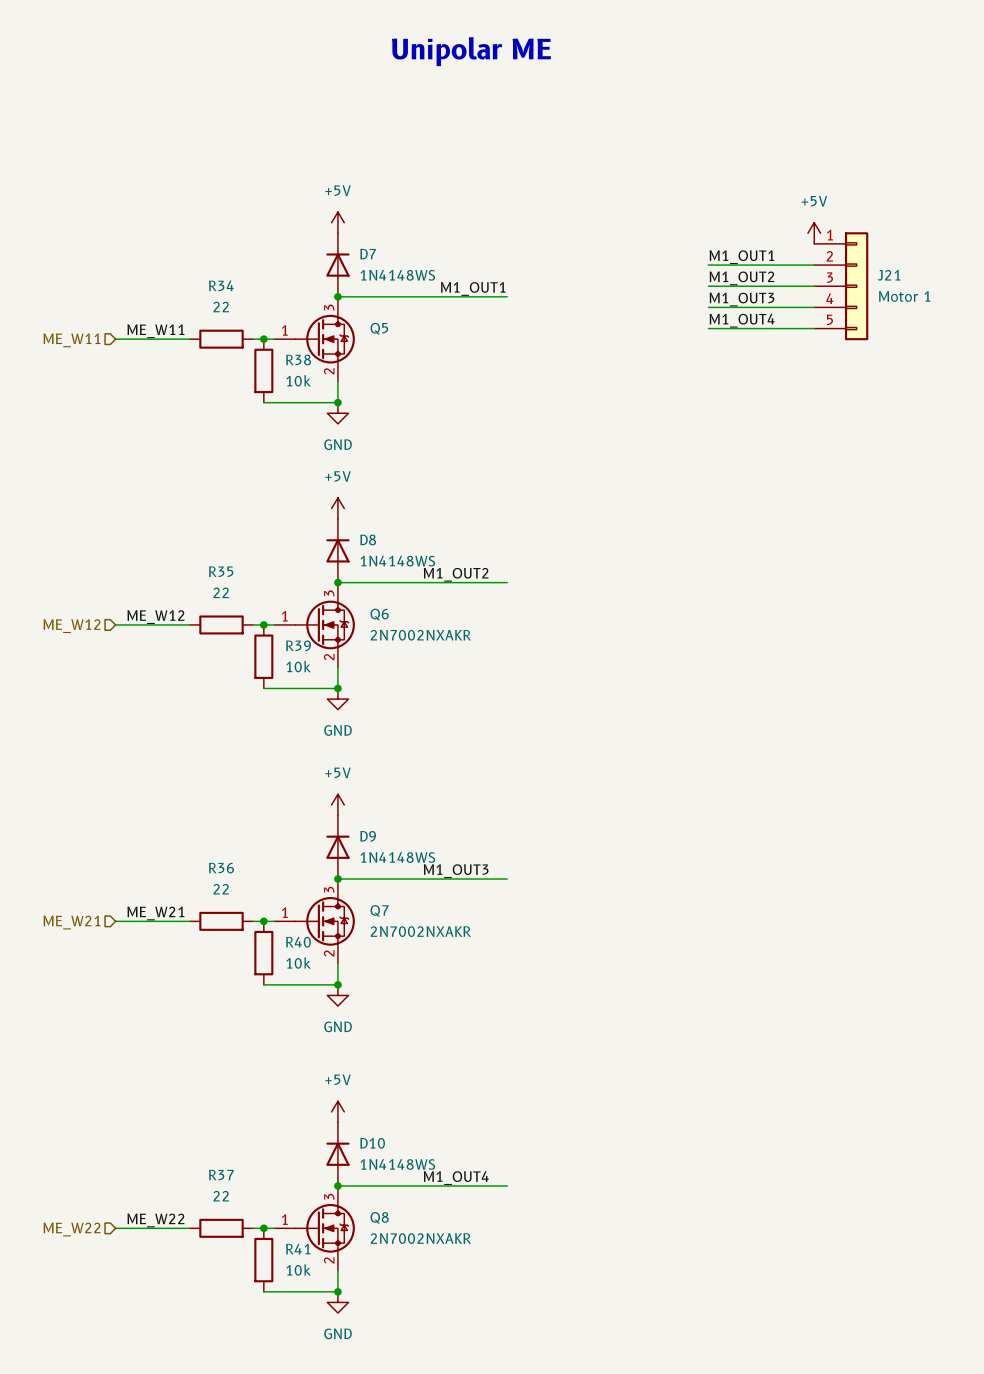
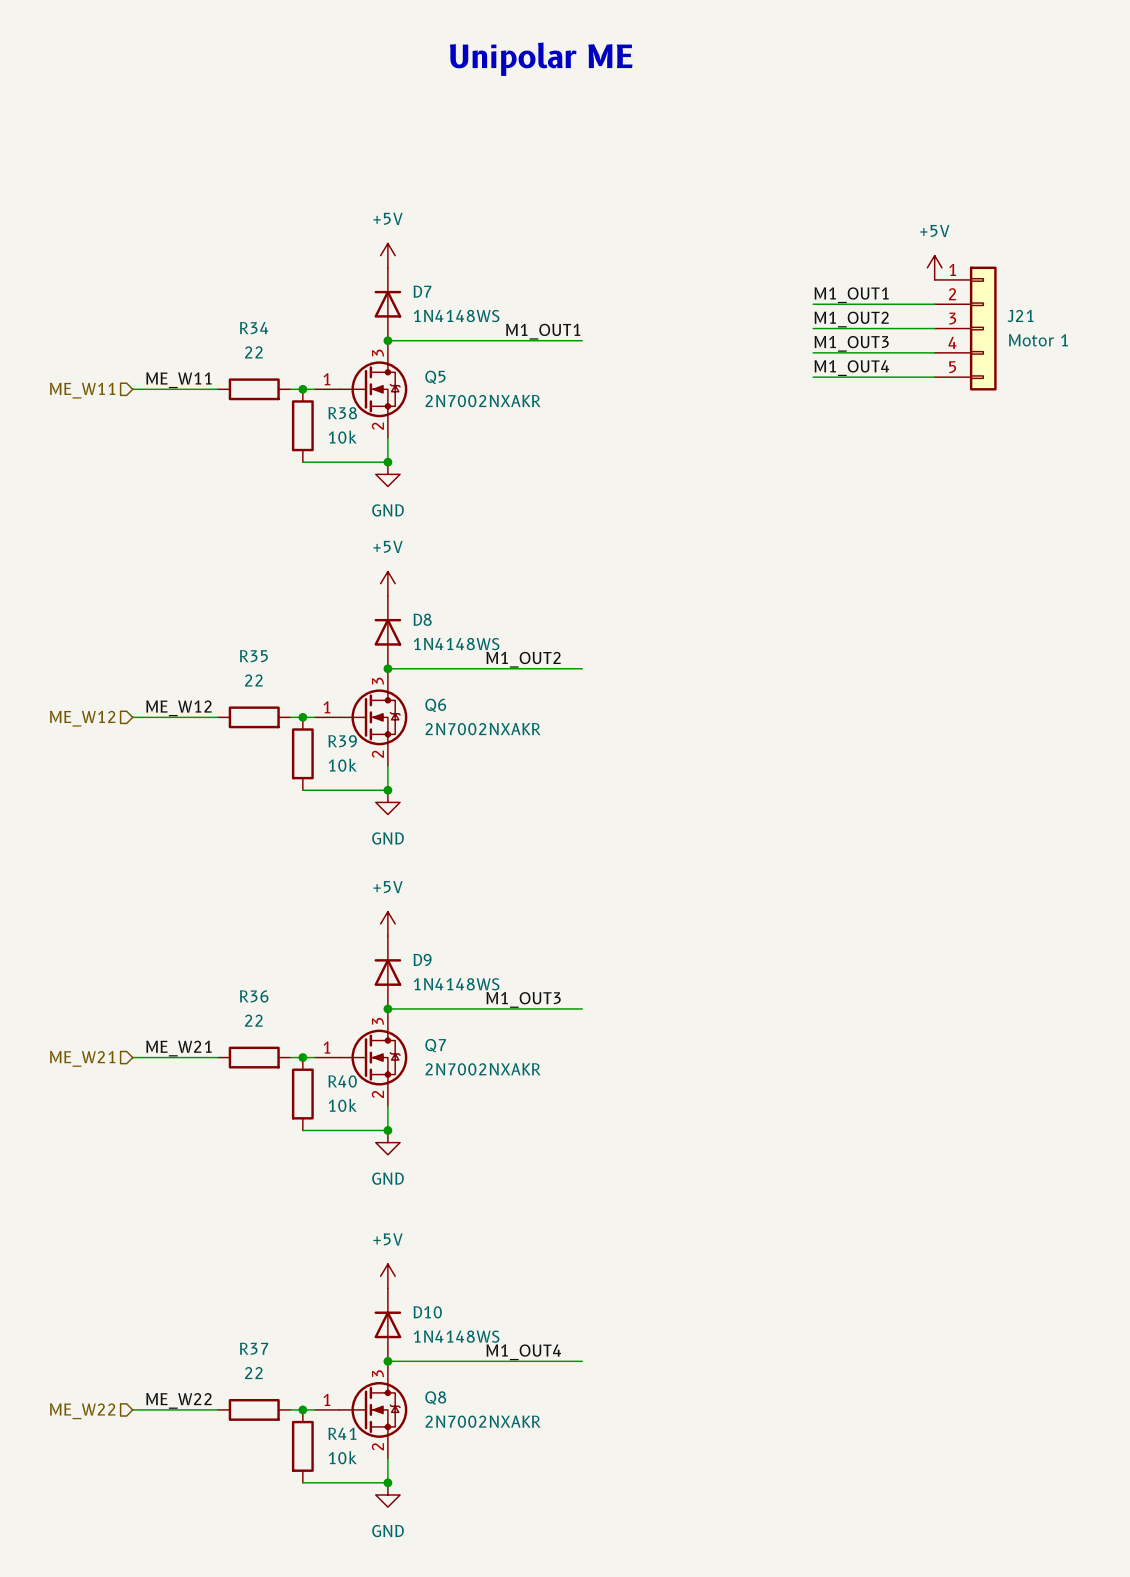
Q5 value: none -> 2N7002NXAKR (483, 401)

